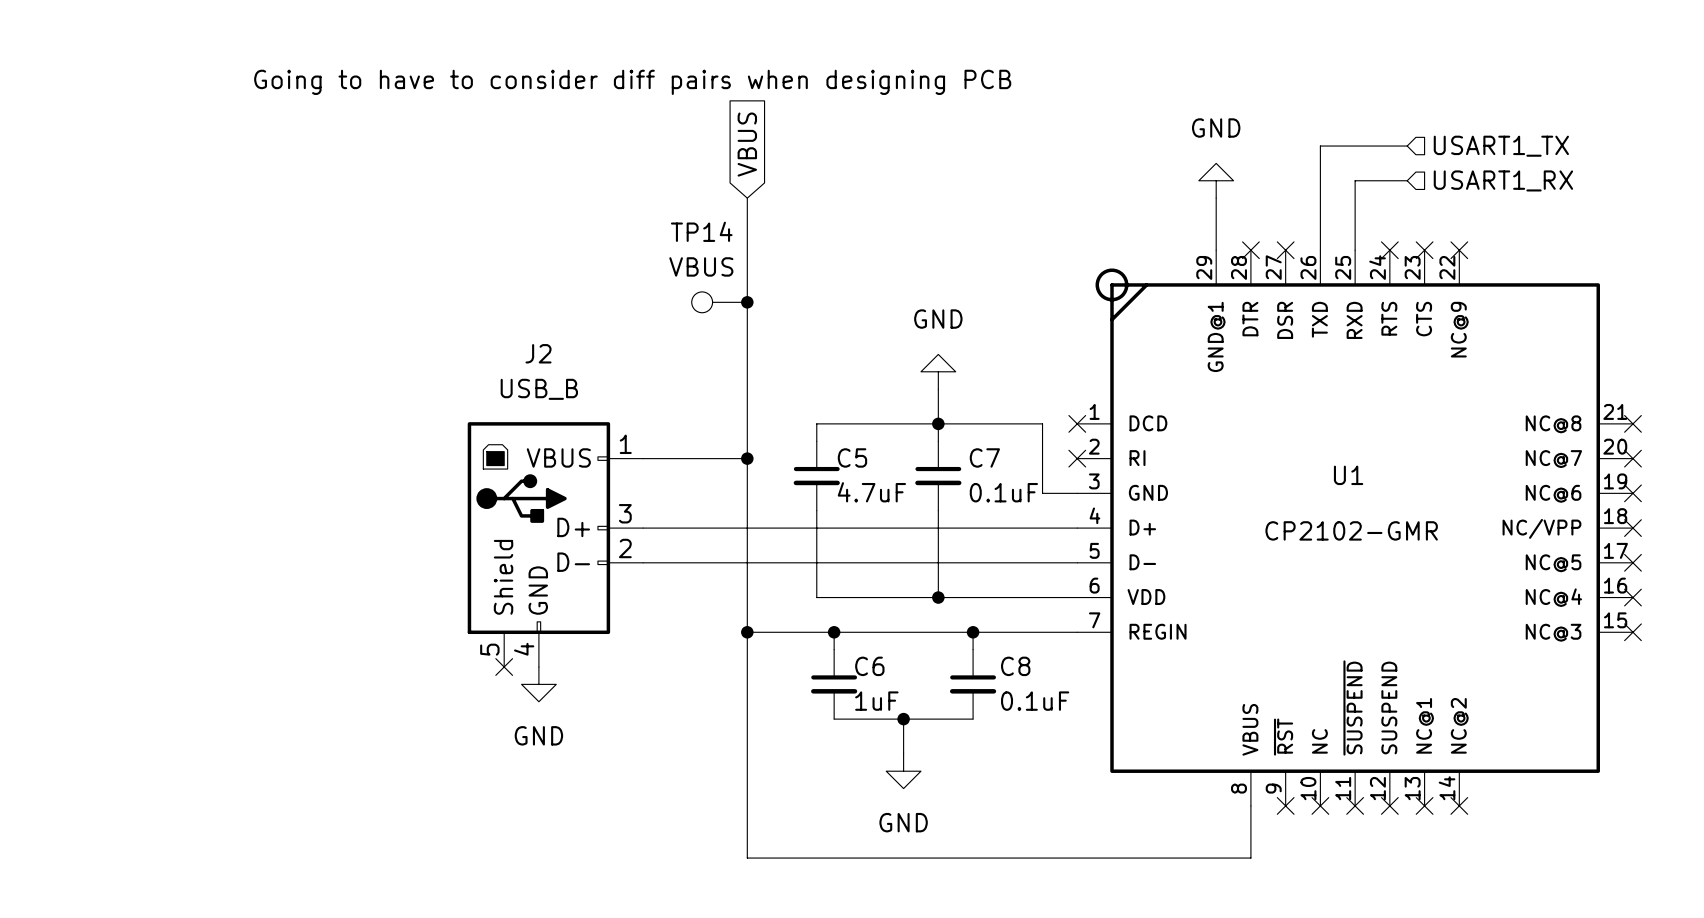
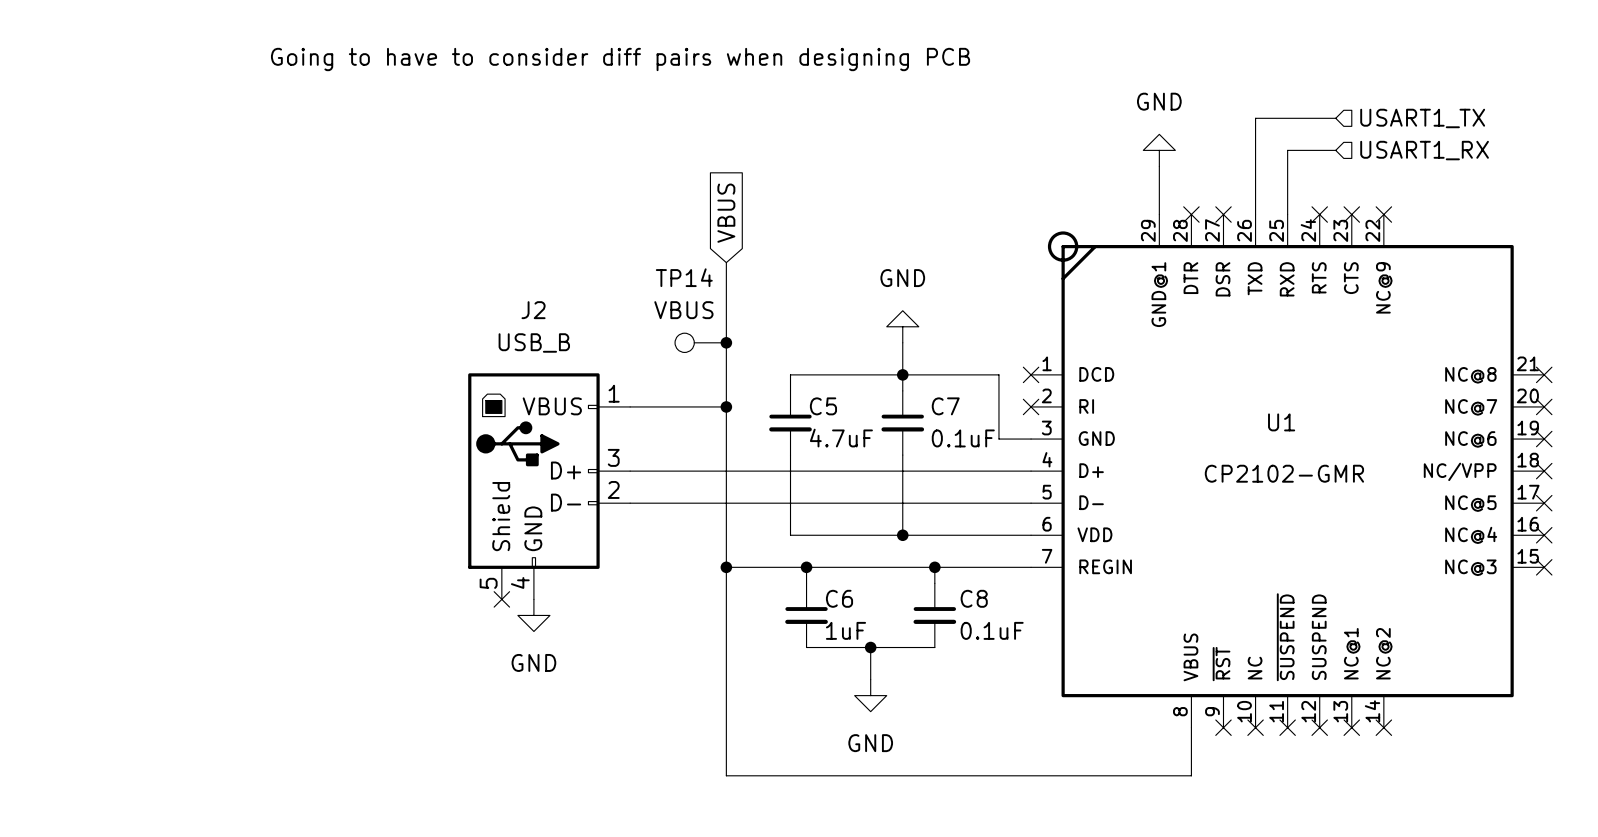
global label position: VBUS (747, 144) -> VBUS (726, 213)
wire: (747, 198) (747, 302) -> none
TP14 position: (719, 302) -> (700, 342)
junction: (747, 302) -> none
junction: none -> (726, 342)

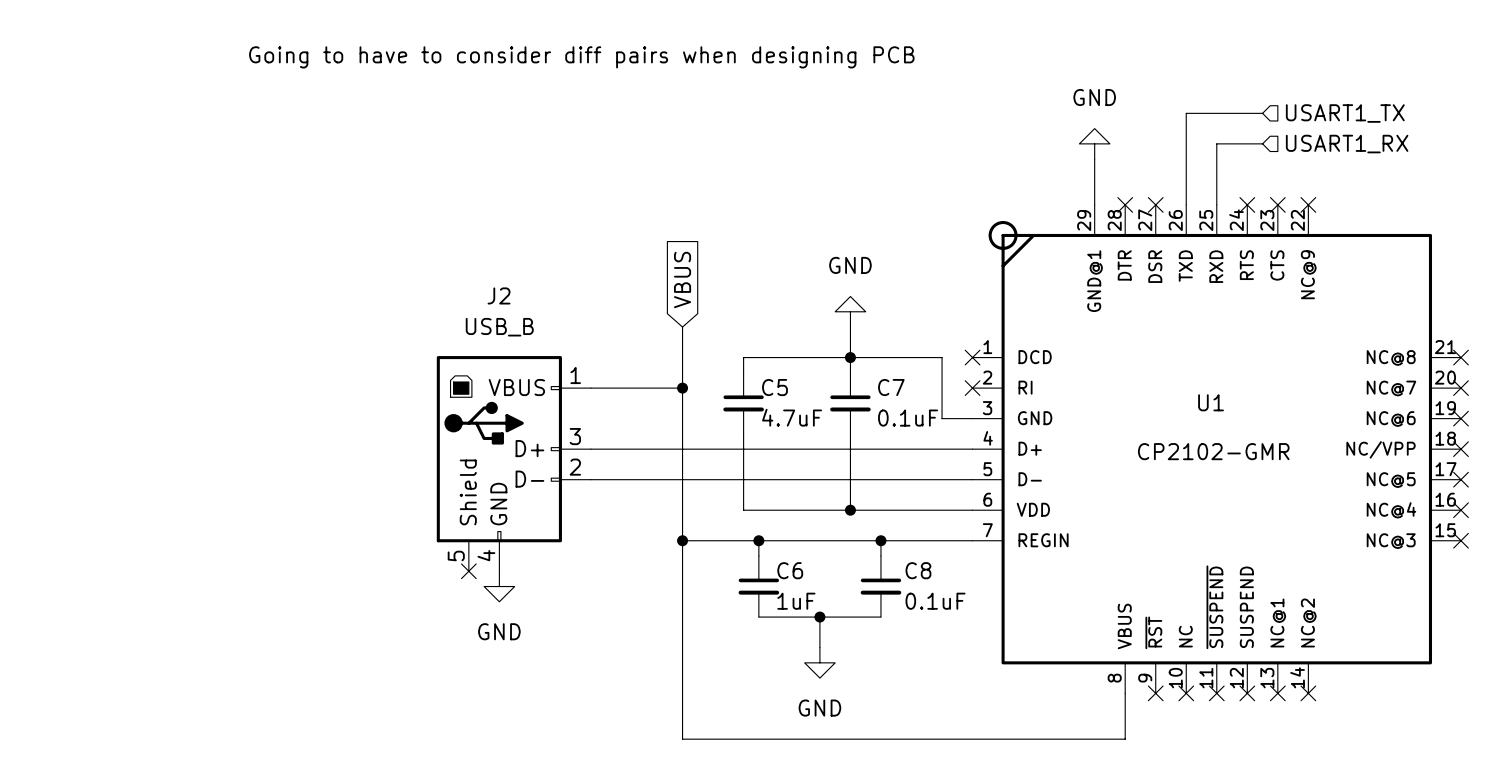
global label position: VBUS (726, 213) -> VBUS (682, 279)
wire: (726, 262) (726, 342) -> none
TP14: VBUS (700, 342) -> none
junction: (726, 342) -> none

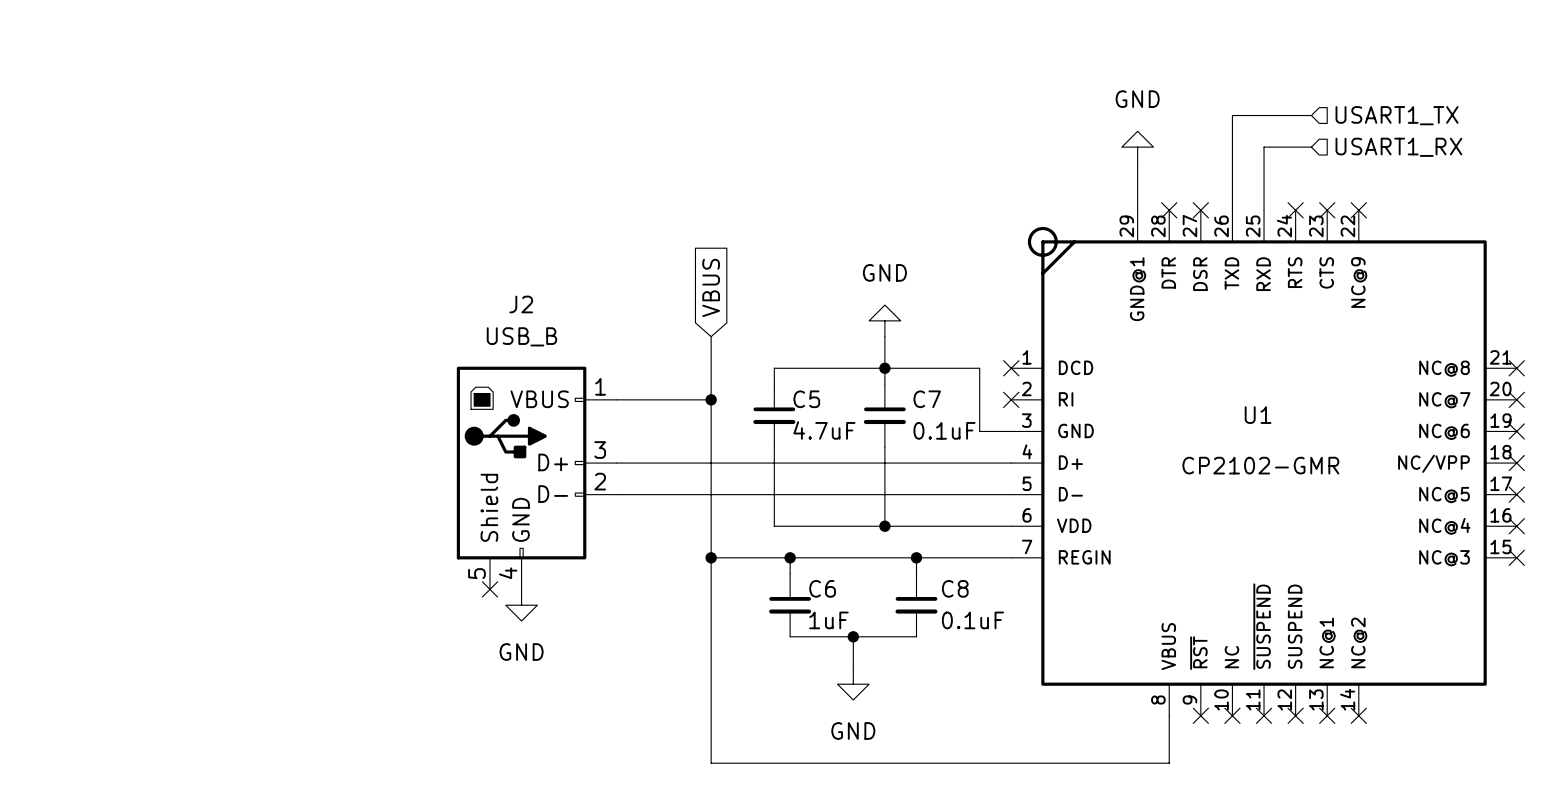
text: Going to have to consider diff pairs when designing PCB (581, 57) -> none

